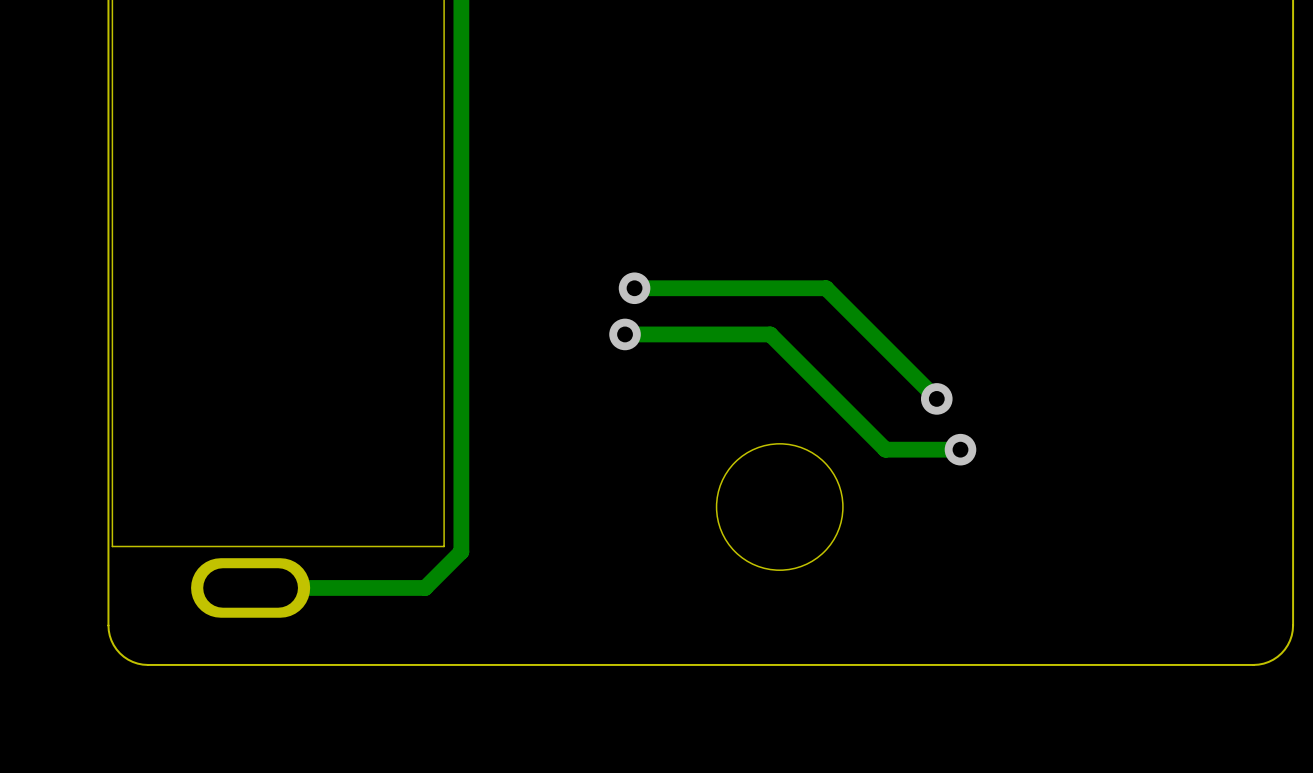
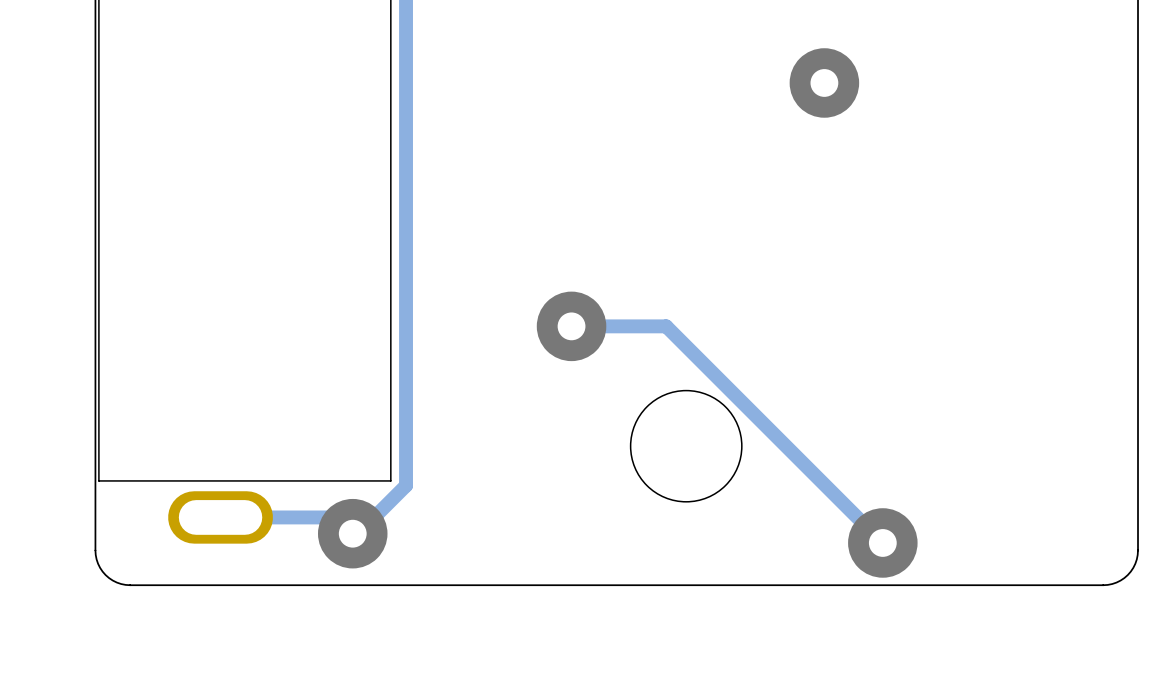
via: none -> (824, 82)
track: (634, 288) (826, 288) (936, 398) -> none
via: (634, 288) -> none
track: (625, 334) (770, 334) (885, 449) (960, 449) -> none
via: (625, 334) -> none
track: none -> (571, 326) (666, 326) (882, 542)
via: none -> (571, 326)
via: (936, 398) -> none
via: (960, 449) -> none
via: none -> (352, 533)
via: none -> (882, 542)

